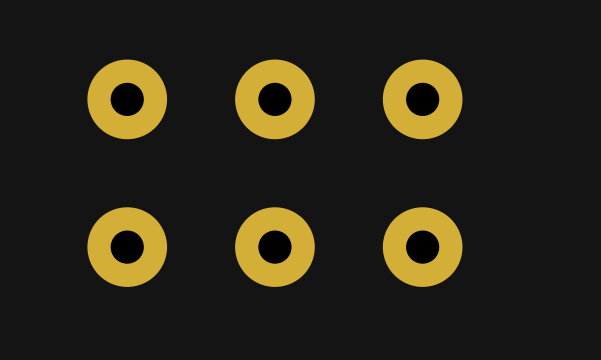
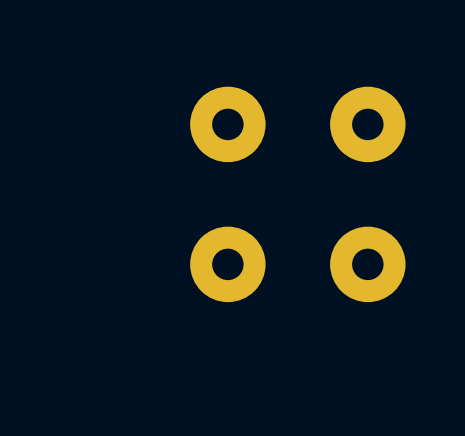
part: (127, 99) -> none
part: (127, 247) -> none

